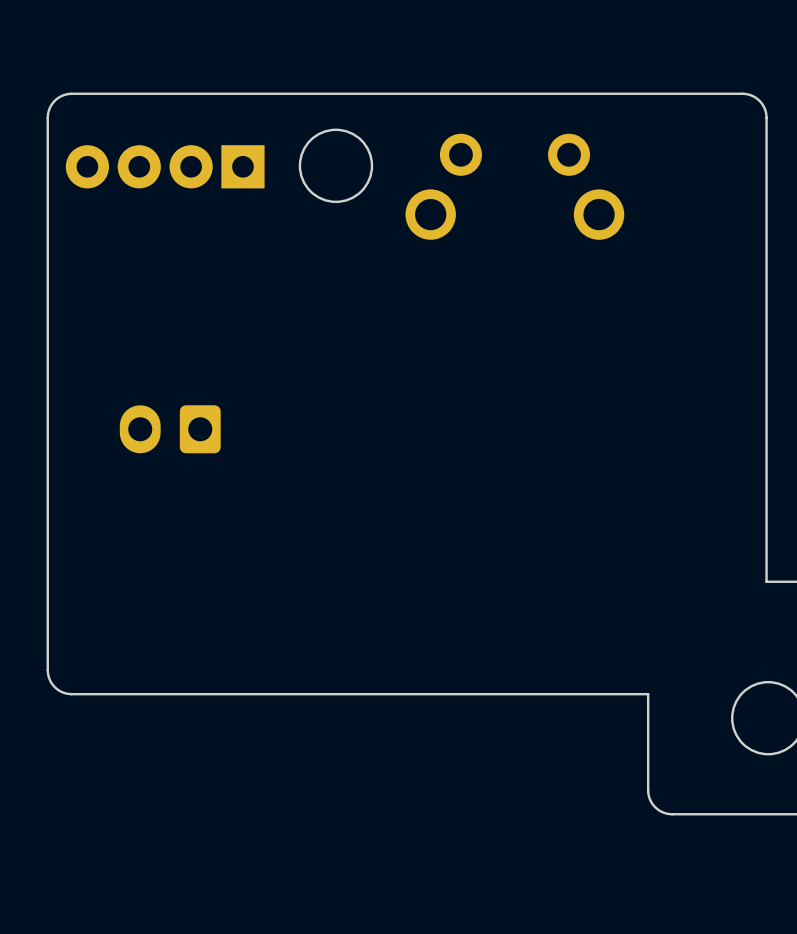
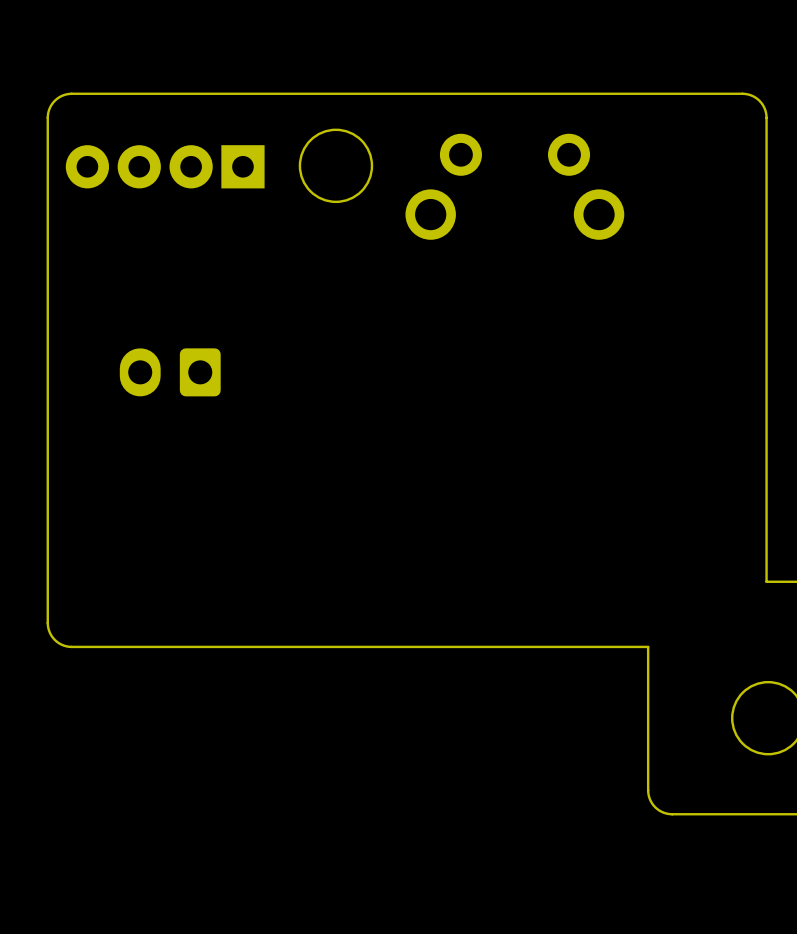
part position: (170, 429) -> (170, 372)
board edge: (47, 622) (49, 678) (56, 688) (69, 694) (648, 694) -> (47, 622) (50, 633) (54, 639) (61, 644) (71, 646) (648, 646) (648, 694)

